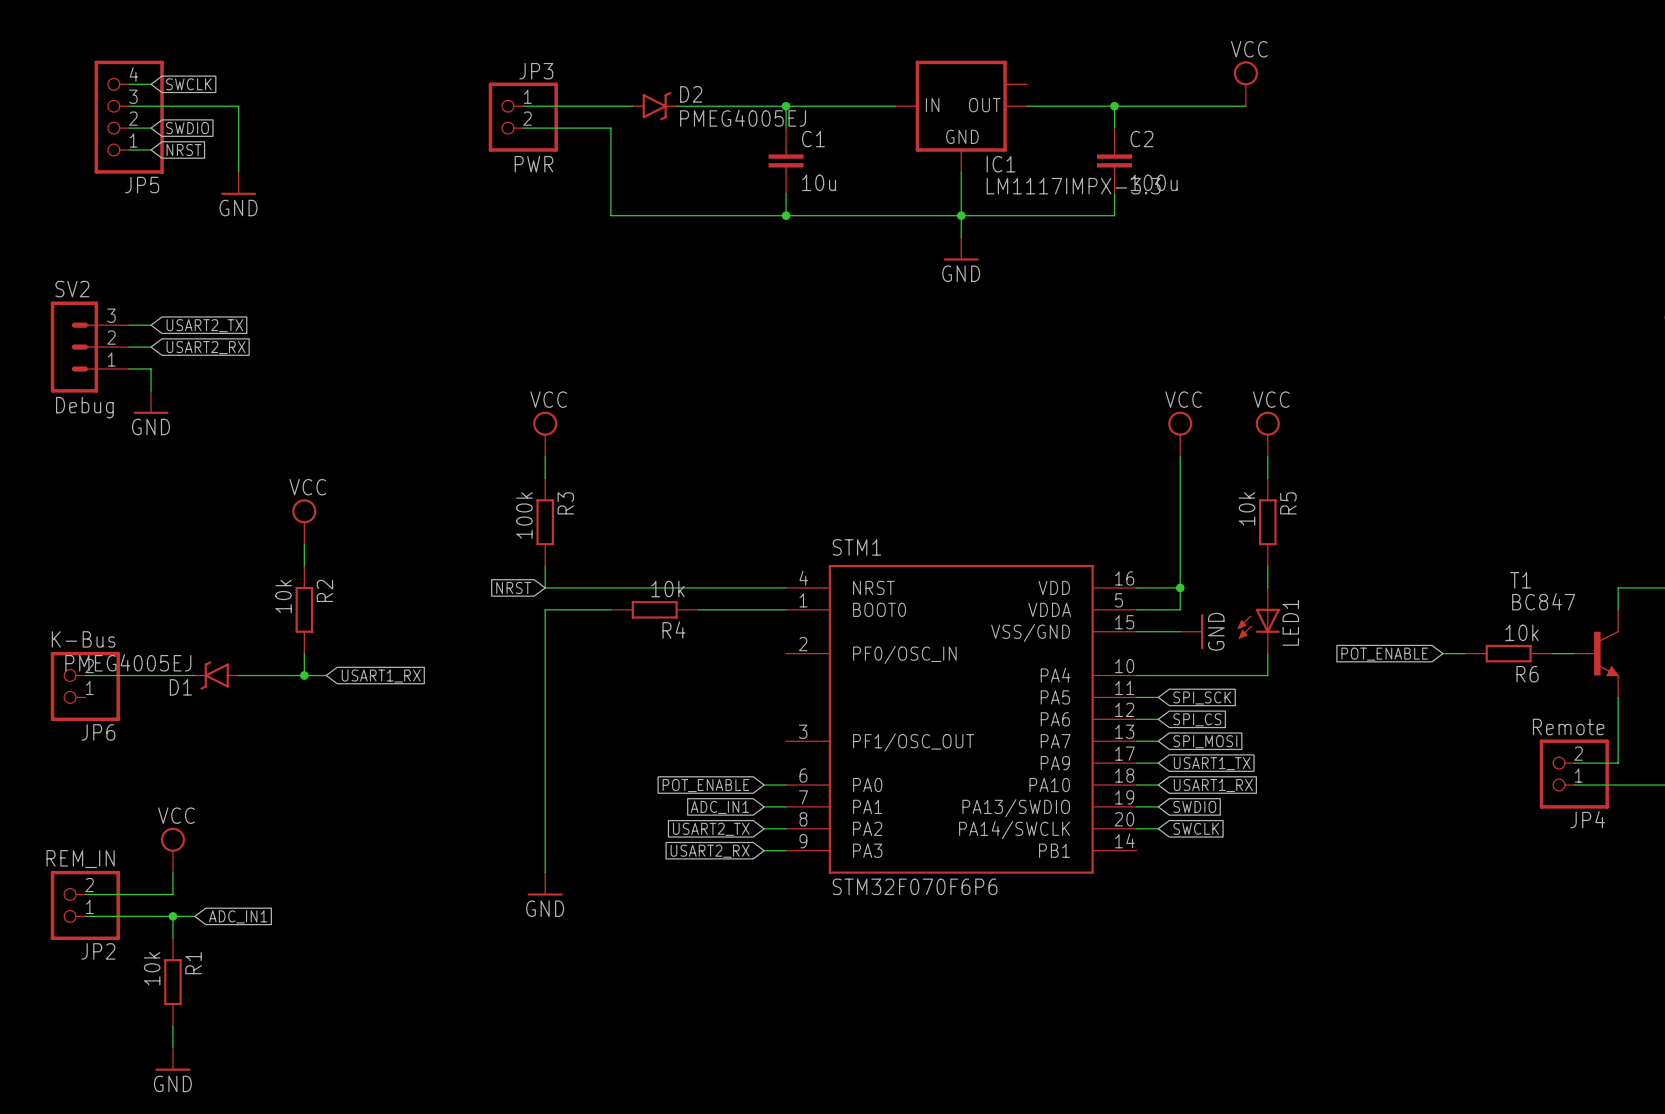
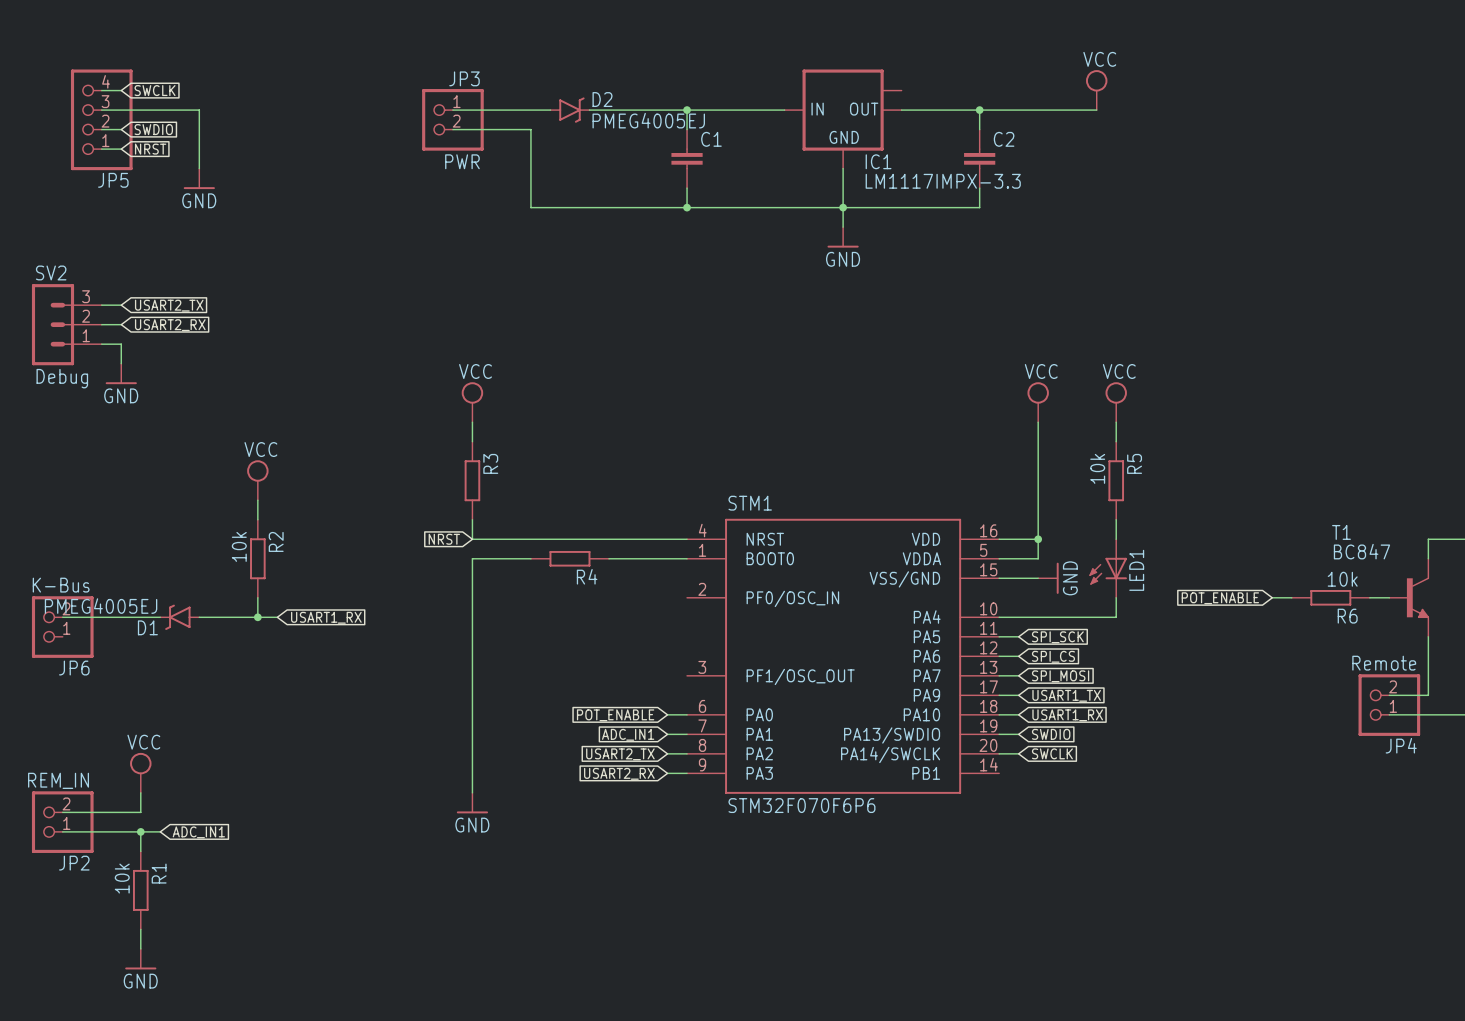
C1 value: 10u (819, 182) -> none
C2 value: 100u (1154, 182) -> none
R3 value: 100k (524, 515) -> none
R4 value: 10k (668, 589) -> none

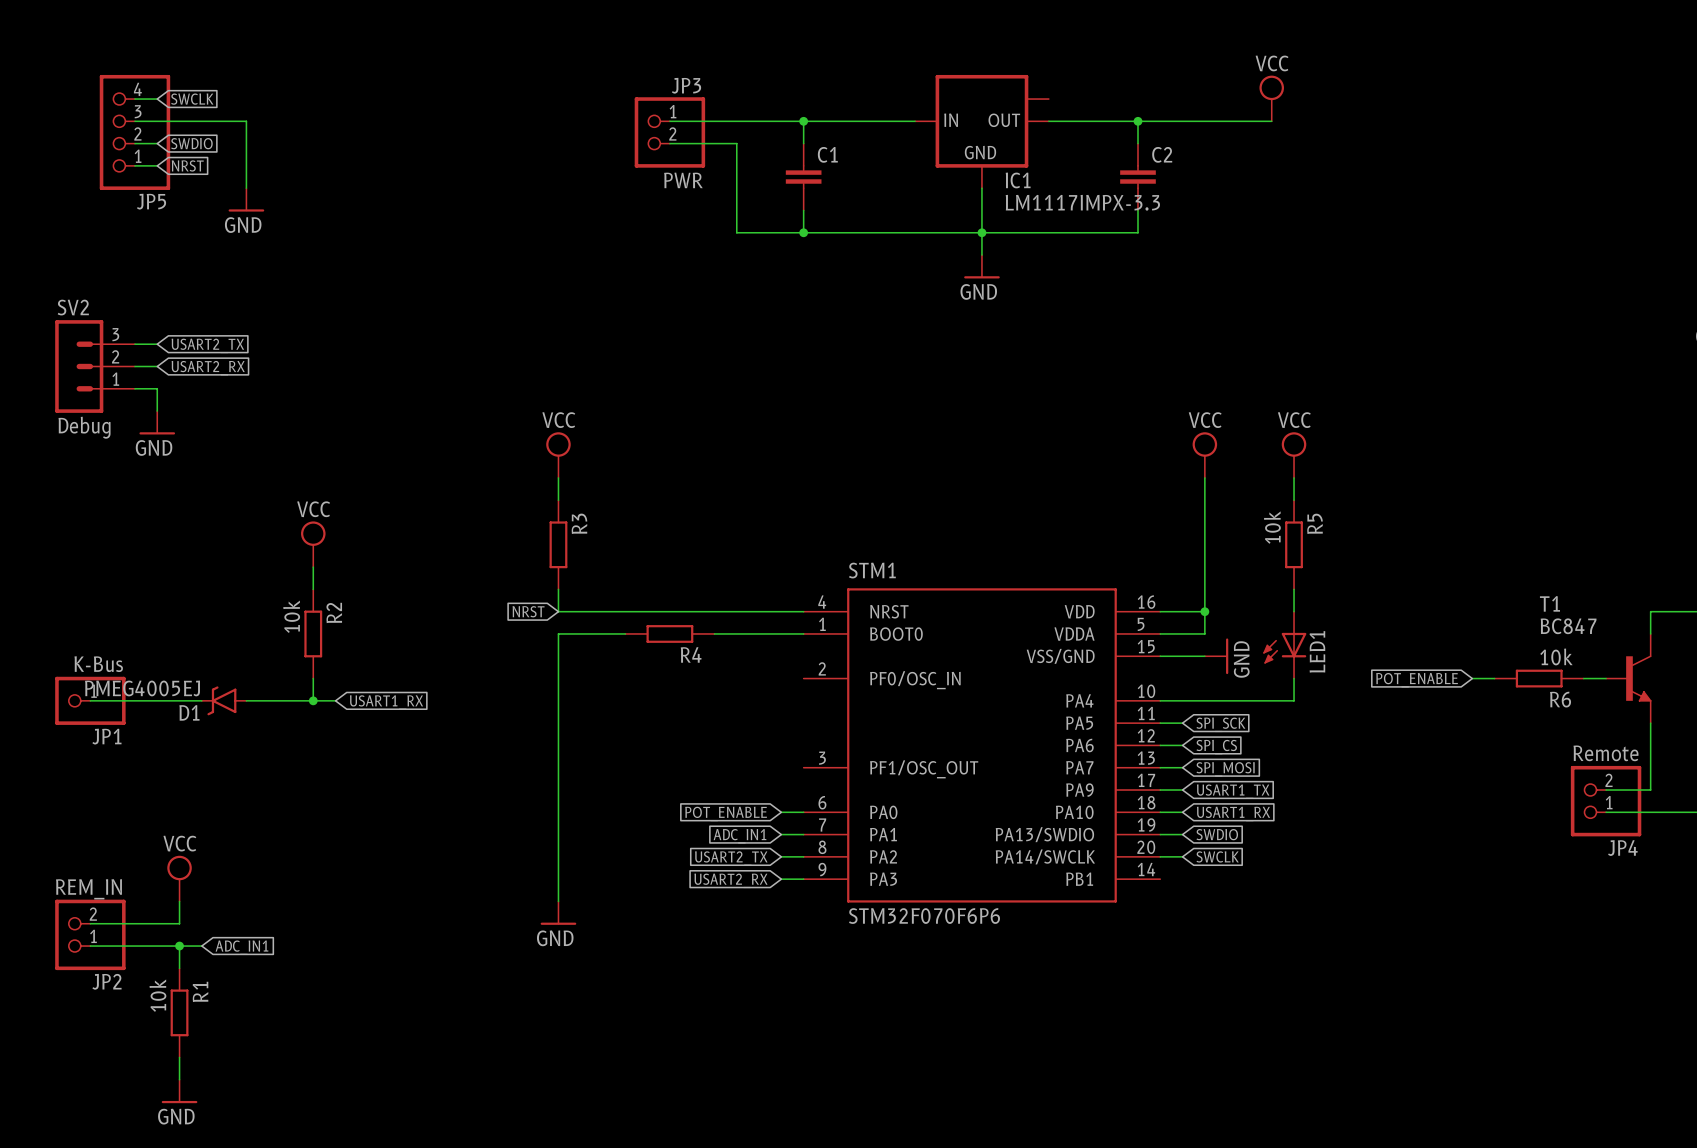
wire: (452, 110) (550, 110) -> none
D2: PMEG4005EJ (569, 110) -> none
JP3 position: (452, 119) -> (669, 132)
wire: (452, 129) (530, 129) (530, 207) (628, 207) -> (669, 143) (736, 143) (736, 232)
JP1: none -> K-Bus (90, 700)
JP6: K-Bus (62, 627) -> none

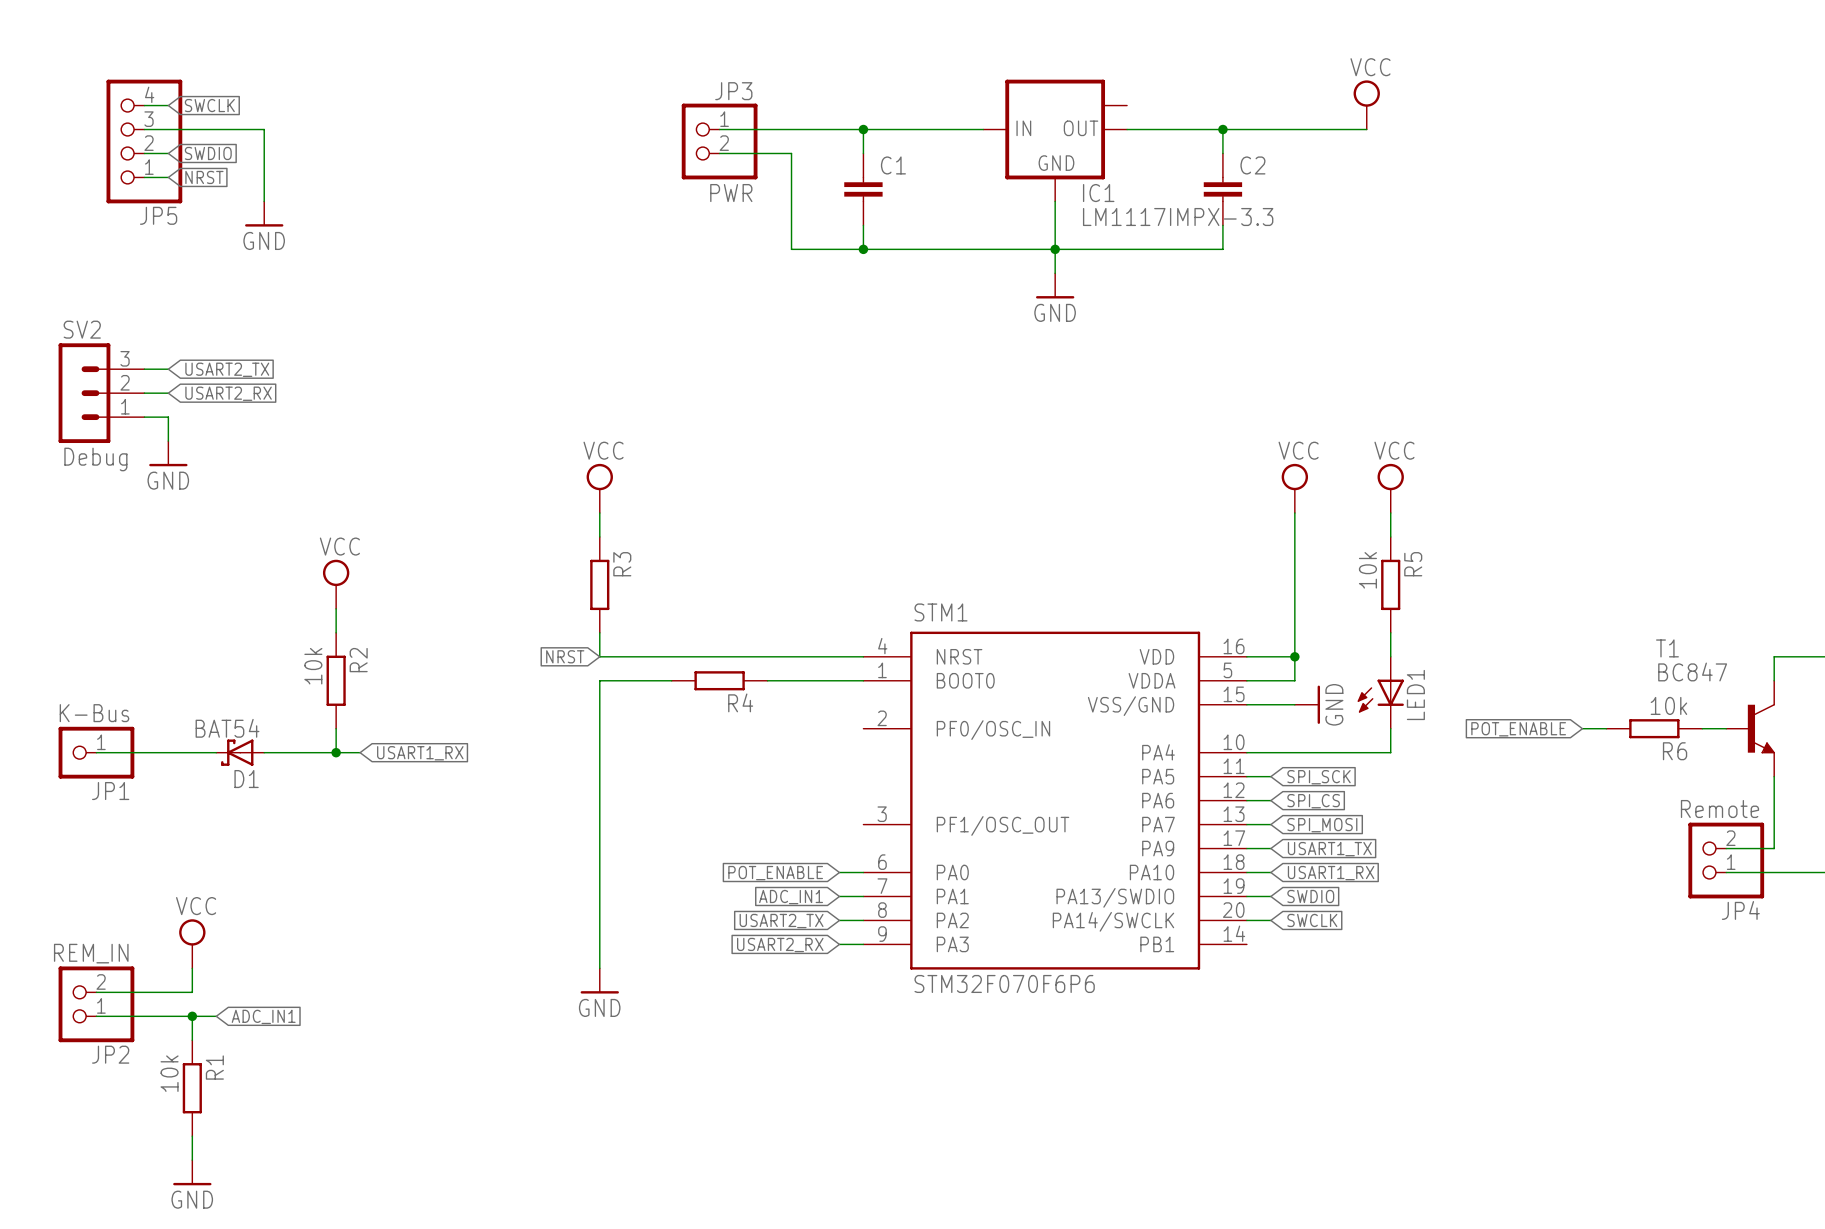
D1 symbol: [201, 686, 248, 716] -> [216, 739, 265, 766]
D1 value: PMEG4005EJ (142, 688) -> BAT54 (227, 728)
D1 name position: D1 (189, 712) -> D1 (246, 779)

